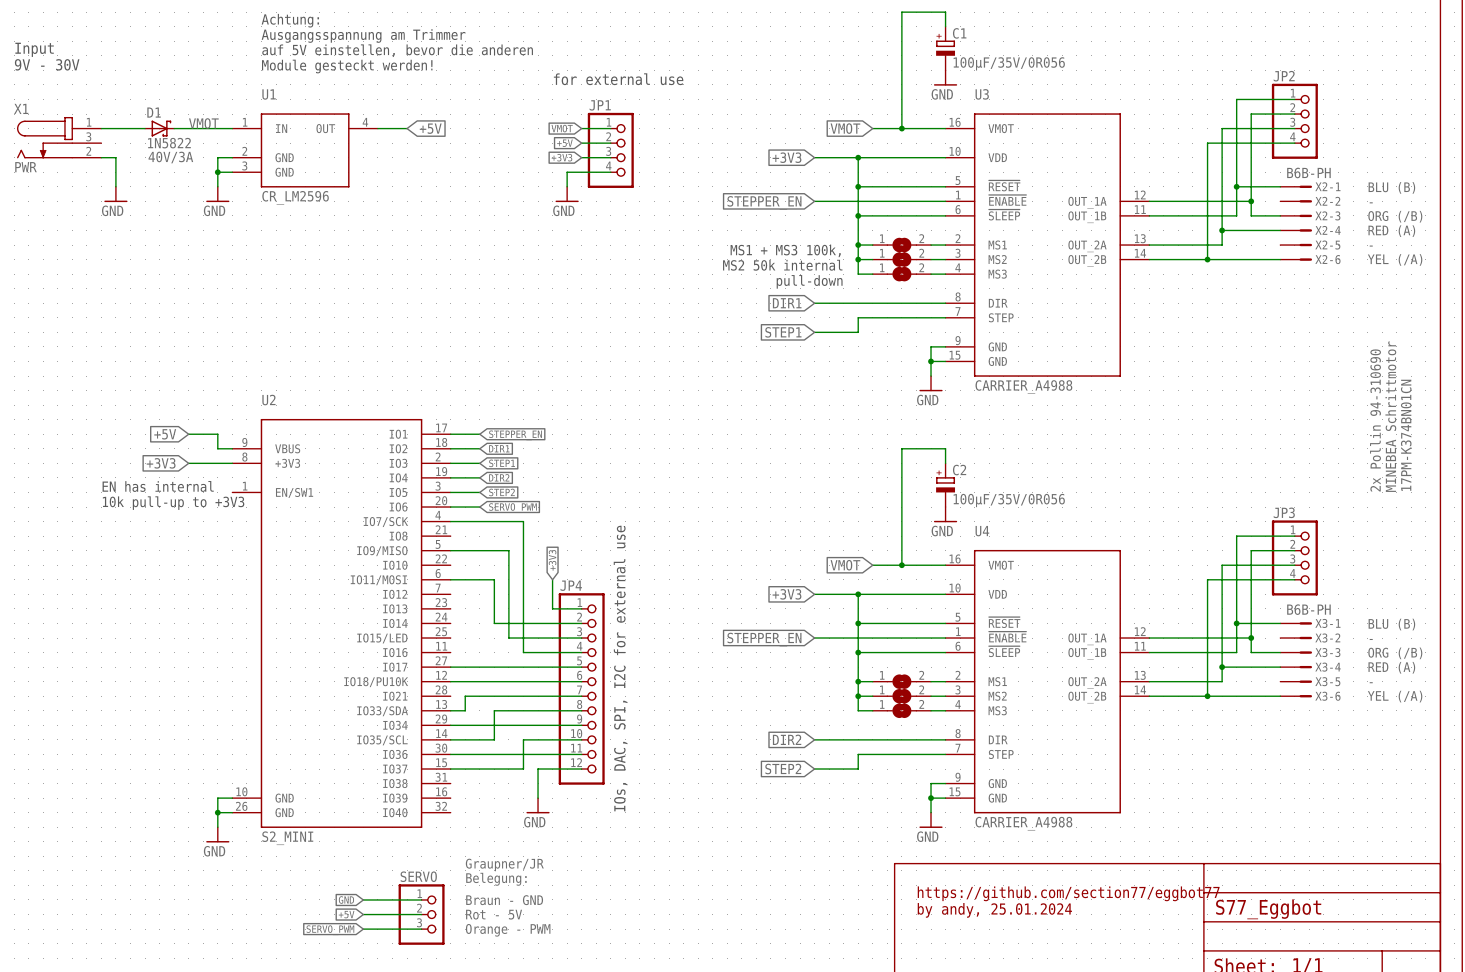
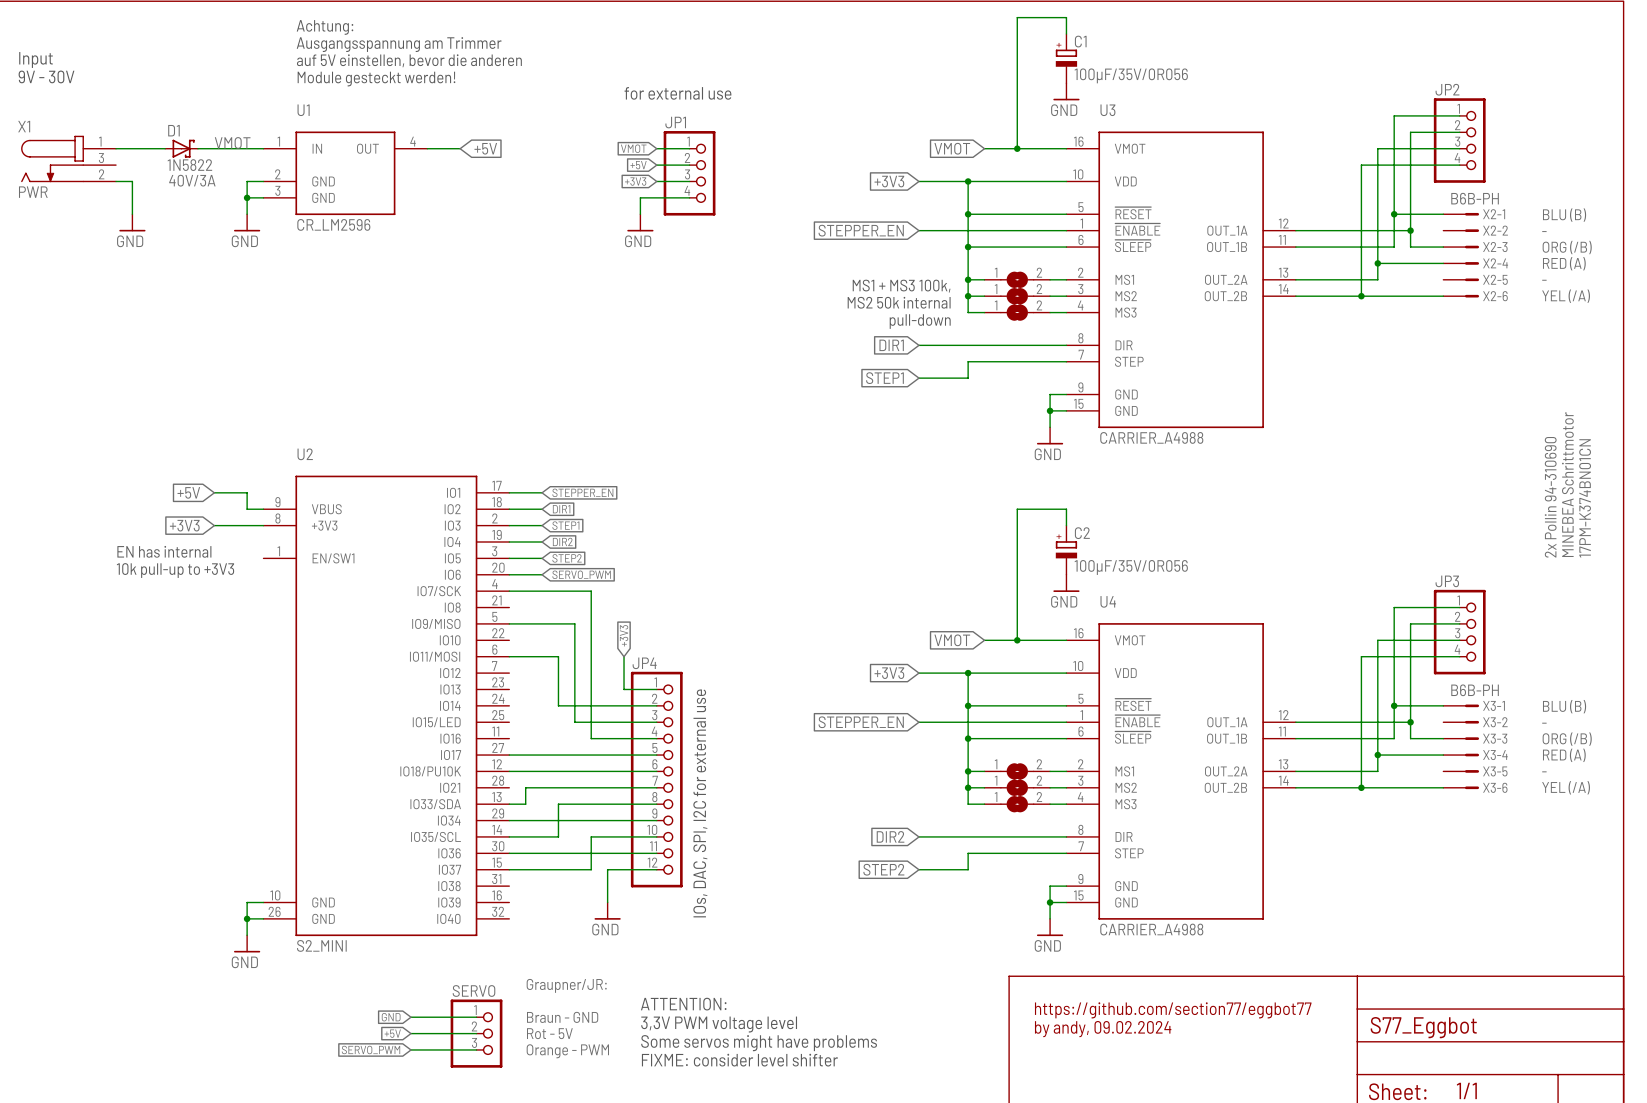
text: Graupner/JR (504, 864) -> Graupner/JR: (566, 985)
text: Belegung: (496, 879) -> none
text: none -> ATTENTION: (683, 1004)
text: none -> 3,3V PWM voltage level (719, 1024)
text: by andy, 25.01.2024 (994, 910) -> by andy, 09.02.2024 (1103, 1029)
text: none -> Some servos might have problems (759, 1043)
text: none -> FIXME: consider level shifter (739, 1060)

